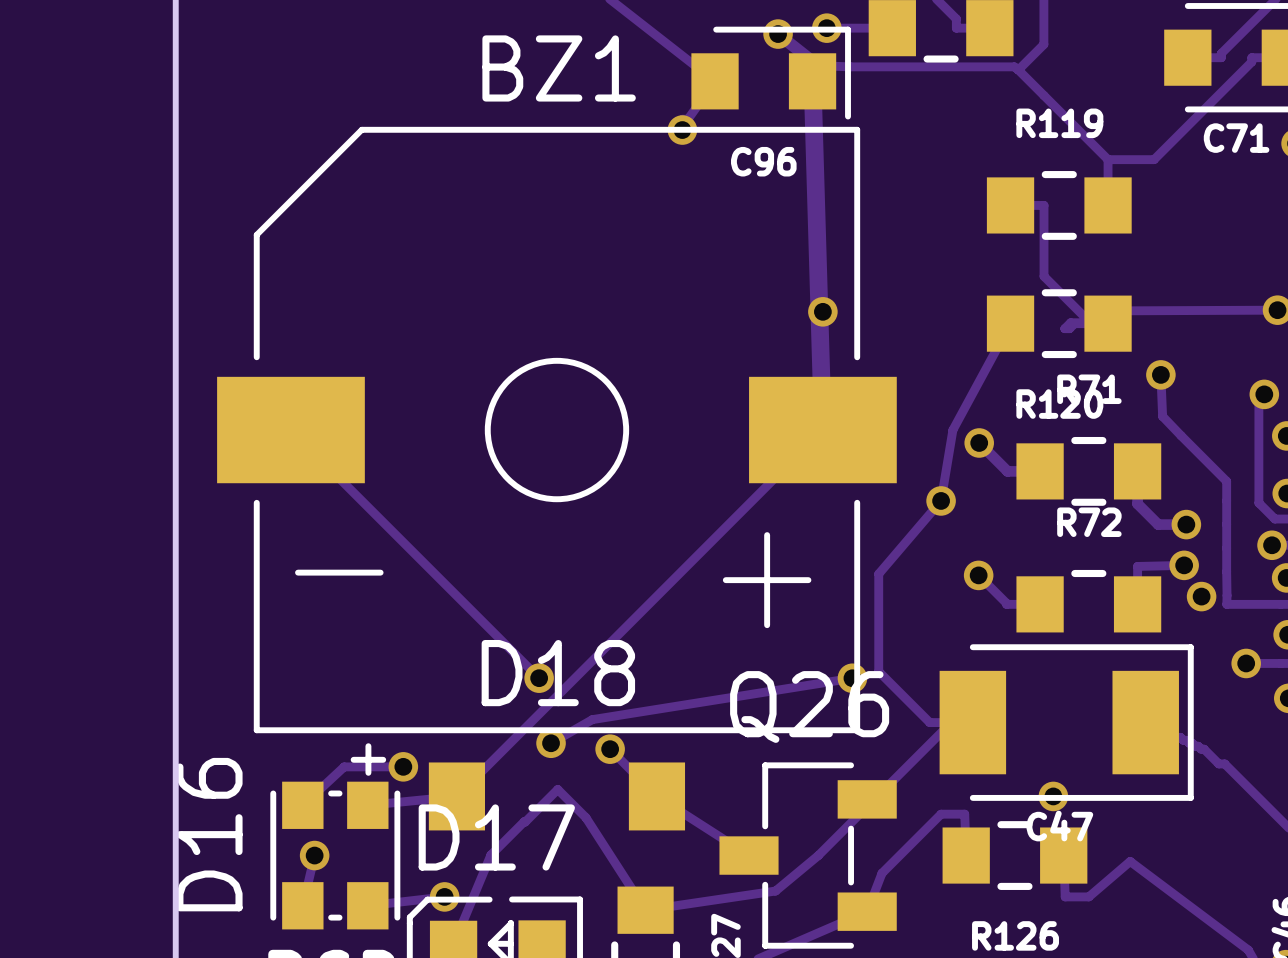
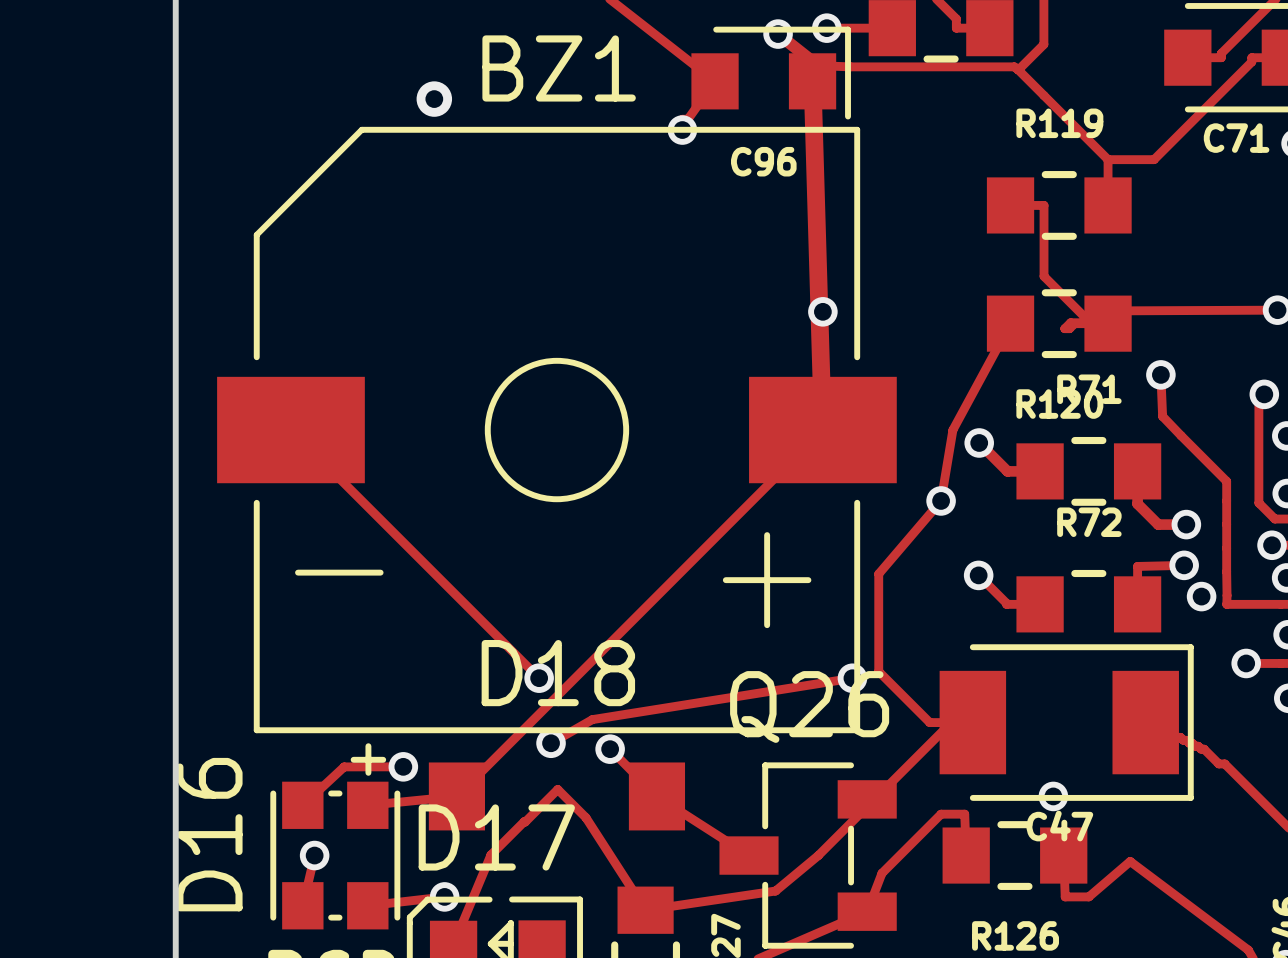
via: none -> (434, 99)

